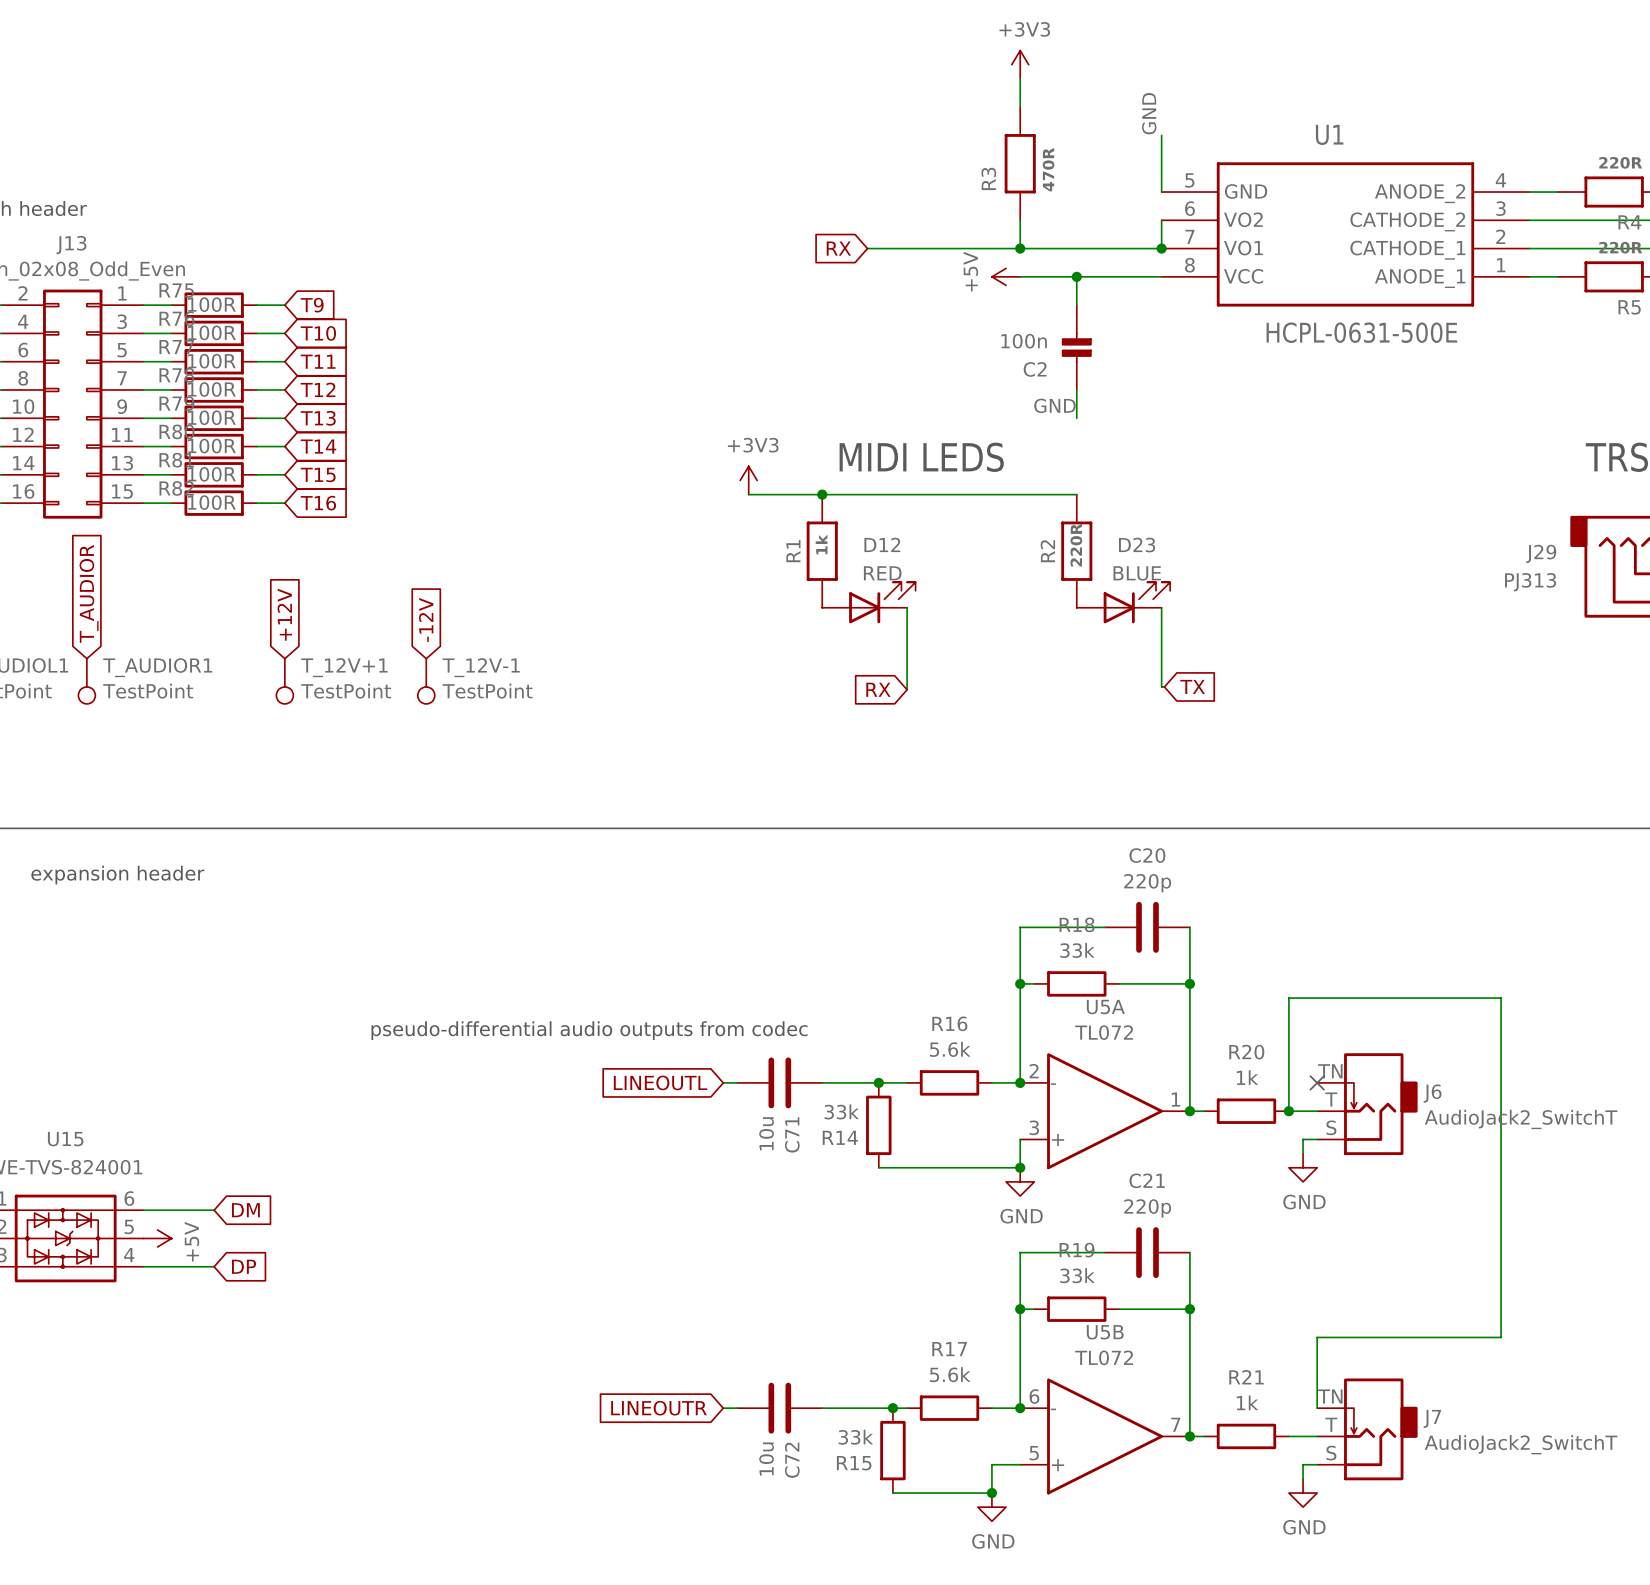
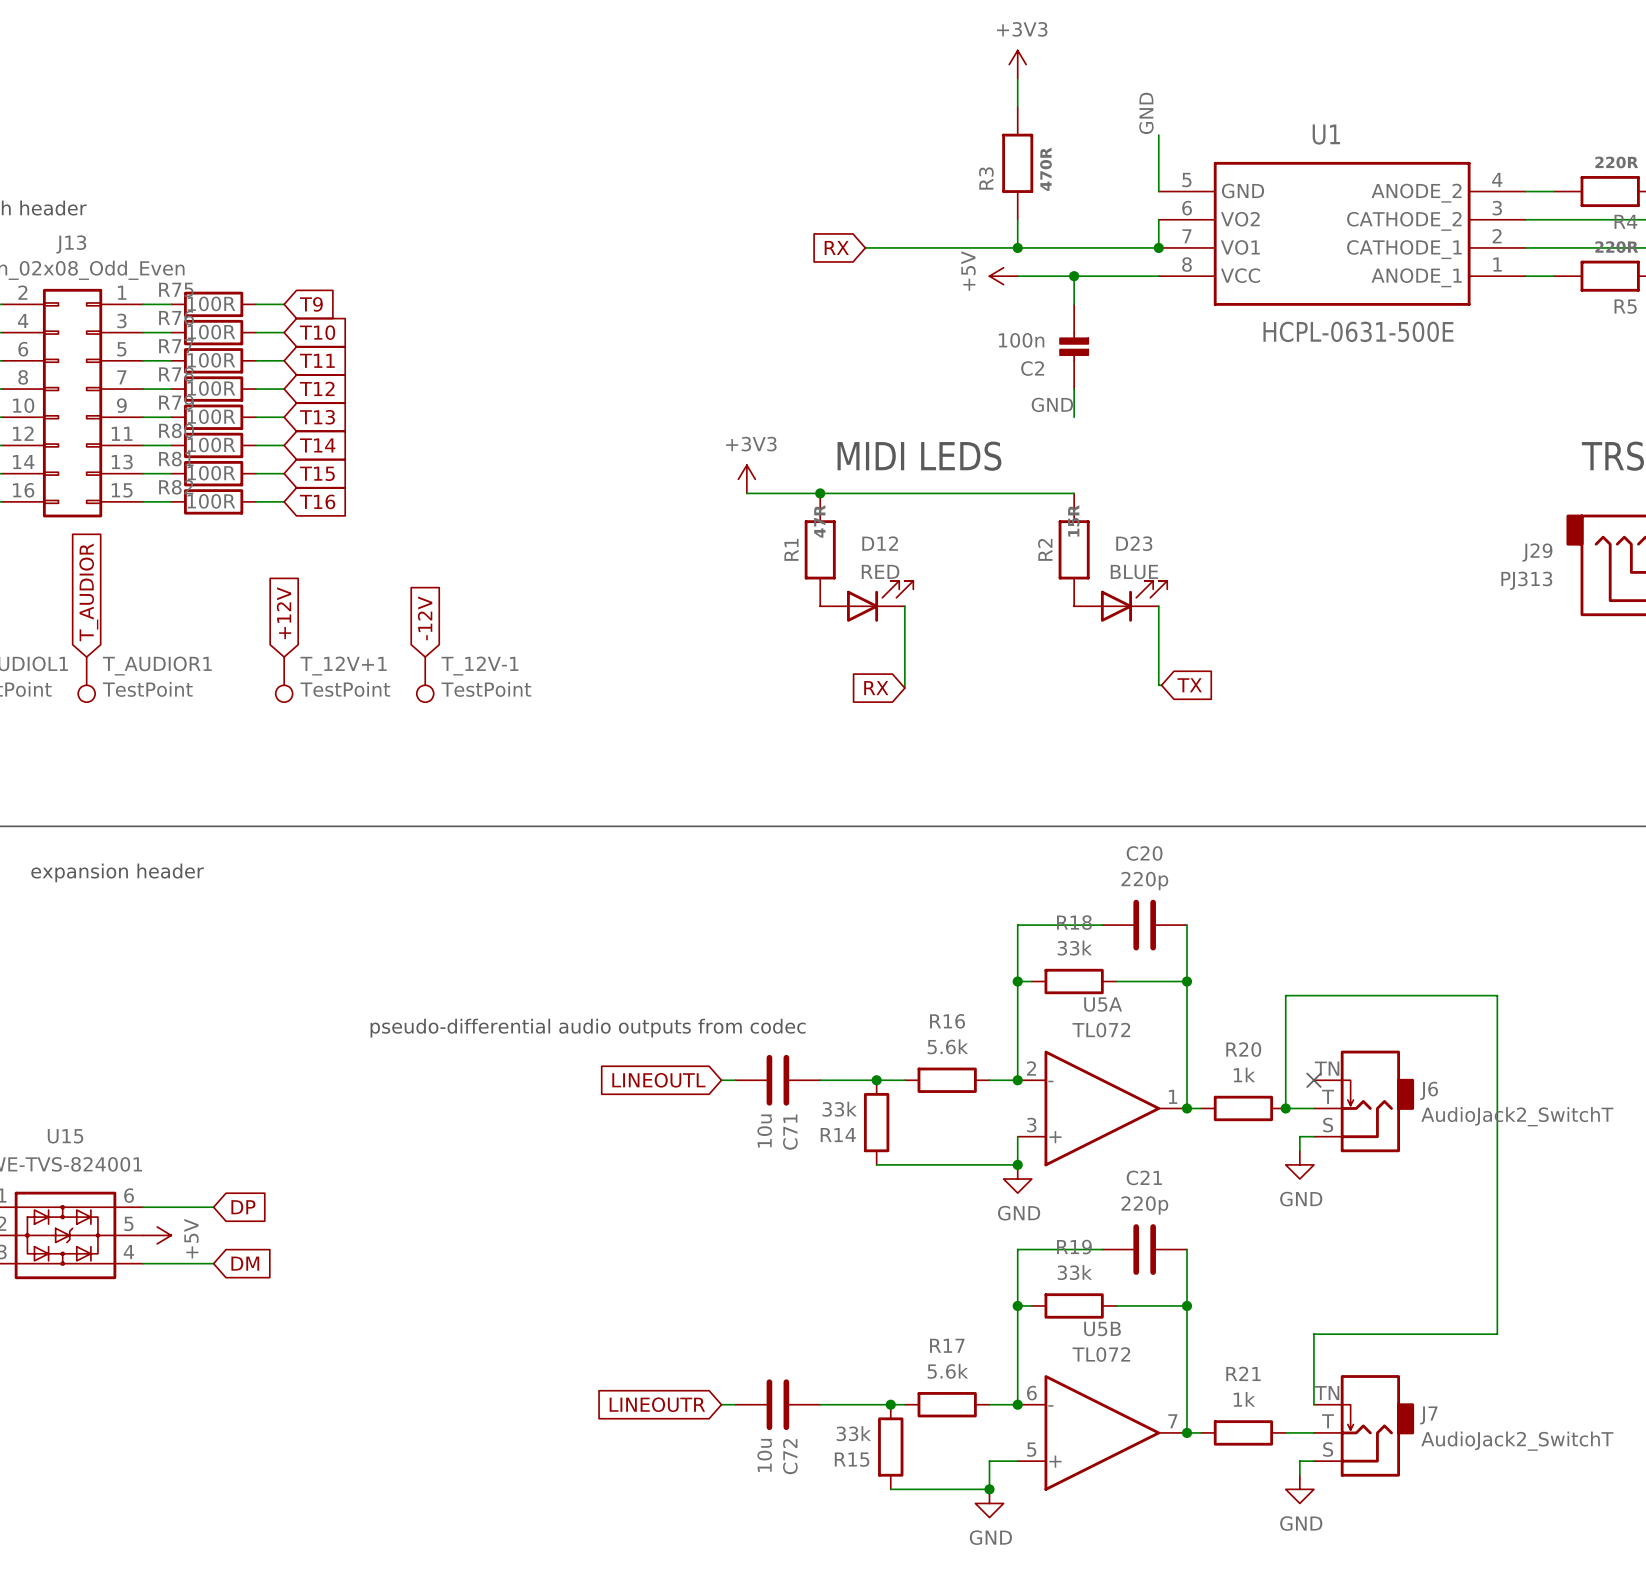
R1 value: 1k (821, 544) -> 47R (819, 521)
R2 value: 220R (1076, 545) -> 15R (1073, 520)
global label: DM (245, 1210) -> DP (243, 1207)
global label: DP (244, 1266) -> DM (245, 1263)

